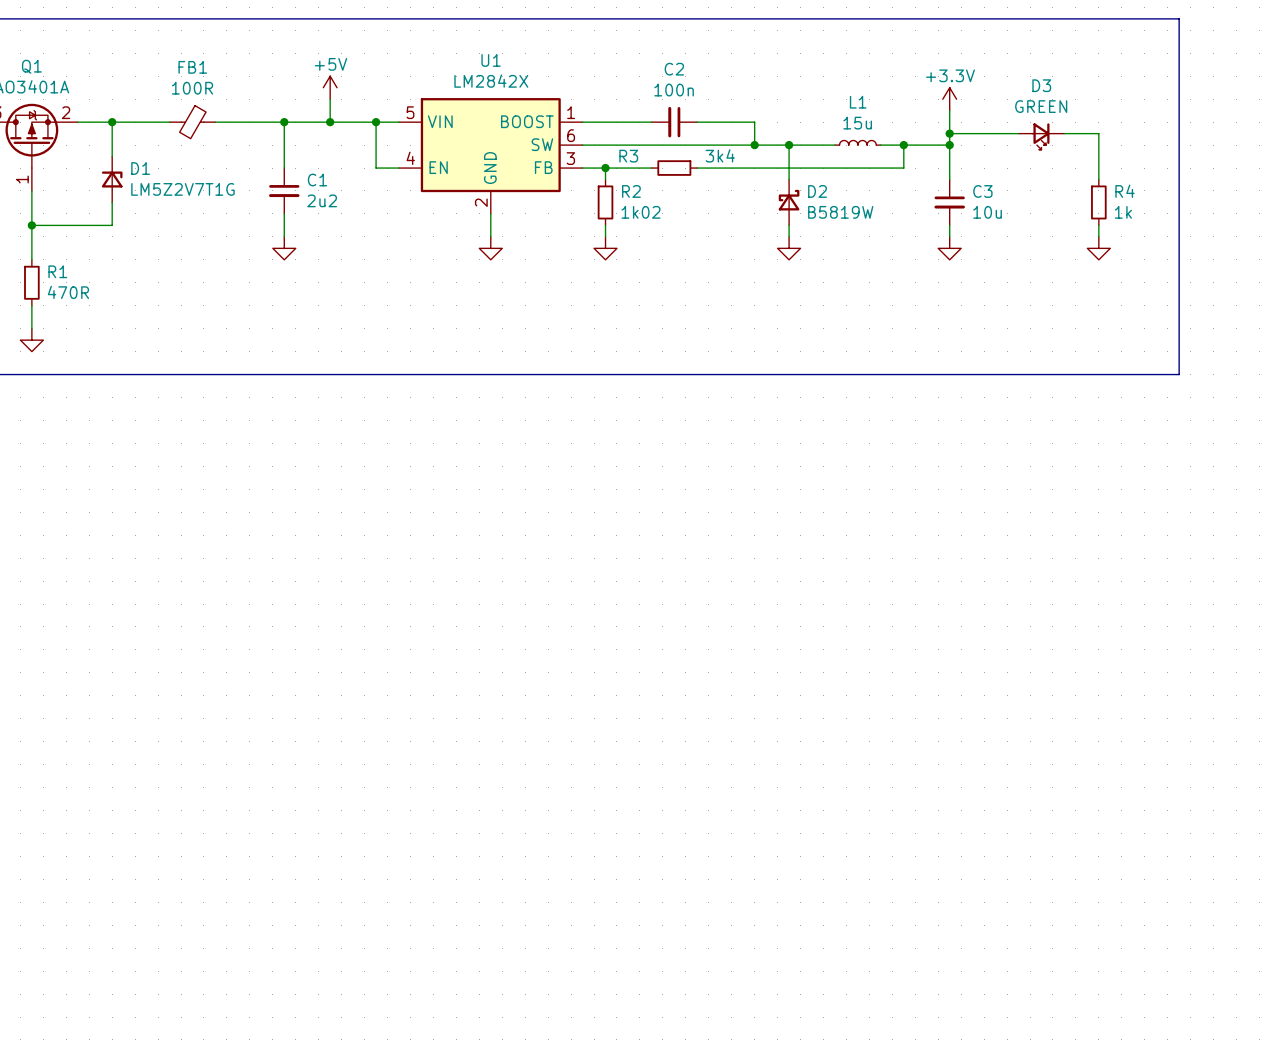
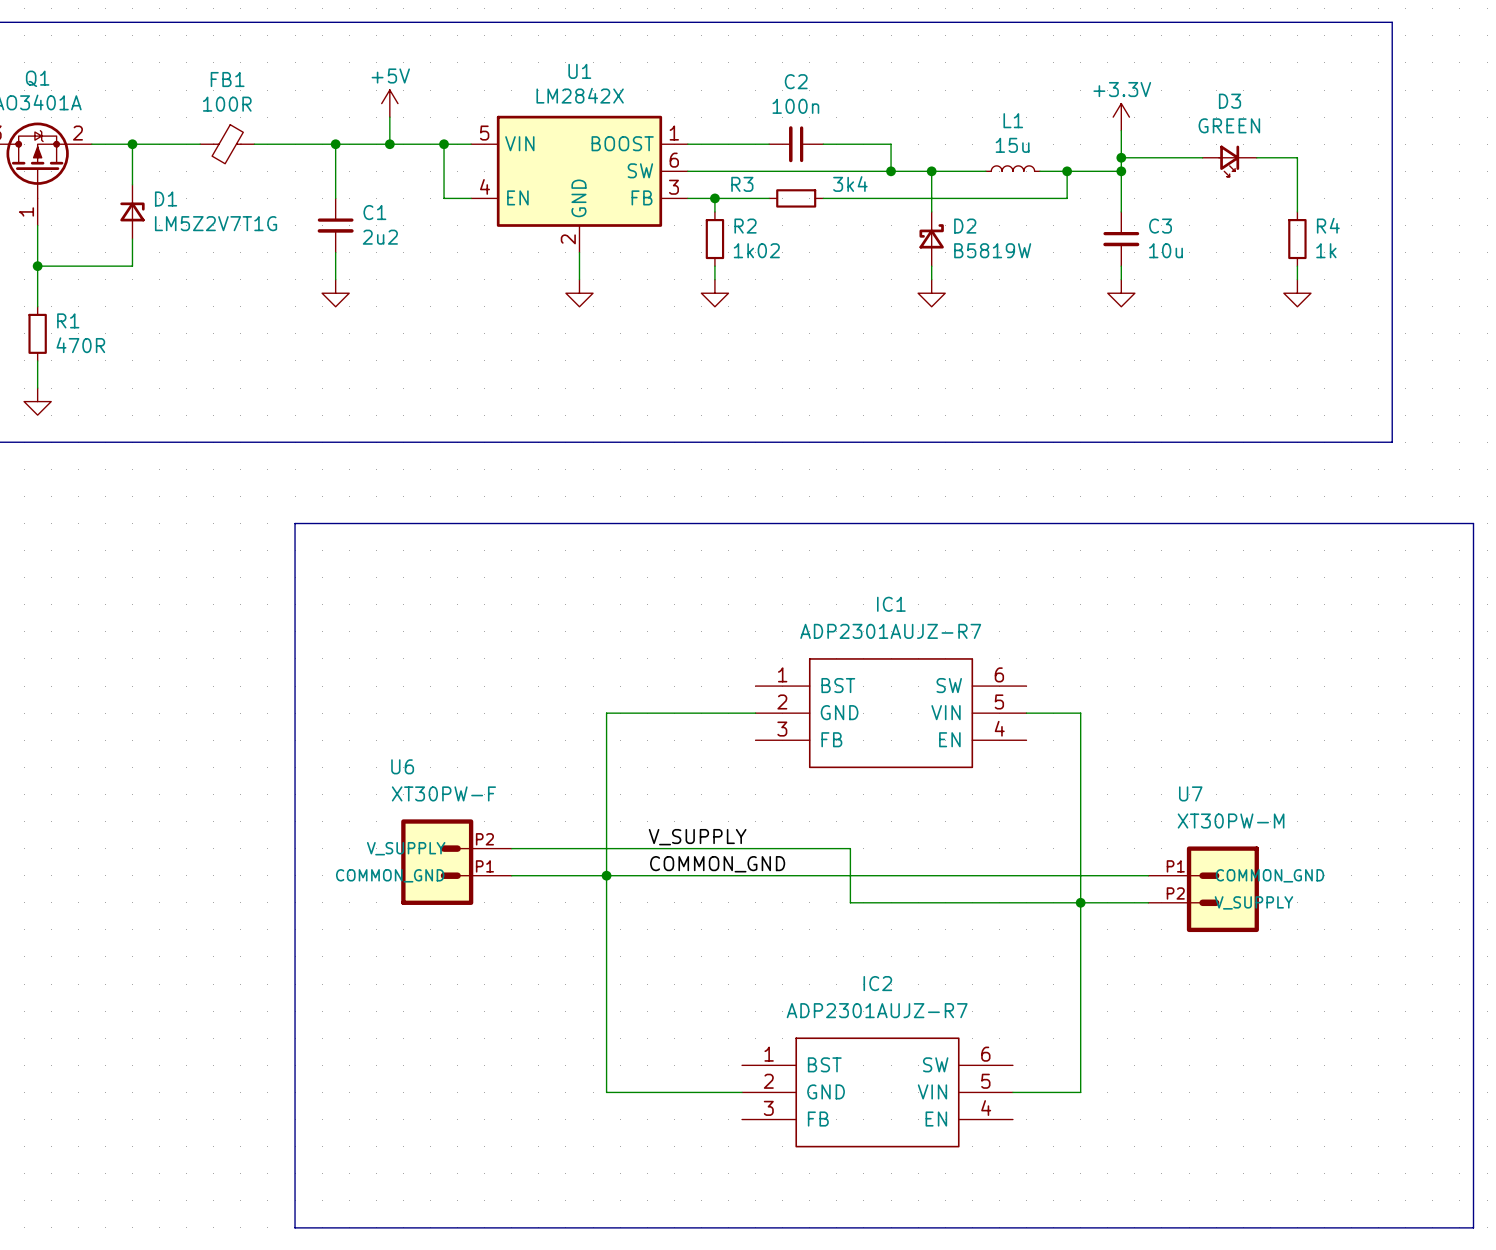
line: none -> (295, 523) (1473, 523) (1473, 1227) (295, 1227) (295, 523)
wire: none -> (755, 713) (606, 713) (606, 1092) (742, 1092)
IC1: none -> ADP2301AUJZ-R7 (891, 713)
wire: none -> (1026, 713) (1080, 713) (1080, 1092) (1012, 1092)
label: none -> V_SUPPLY (697, 837)
wire: none -> (511, 848) (850, 848) (850, 902) (1148, 902)
U6: none -> XT30PW-F (456, 862)
label: none -> COMMON_GND (717, 864)
wire: none -> (511, 875) (1148, 875)
junction: none -> (606, 875)
U7: none -> XT30PW-M (1203, 889)
junction: none -> (1080, 902)
IC2: none -> ADP2301AUJZ-R7 (877, 1092)

